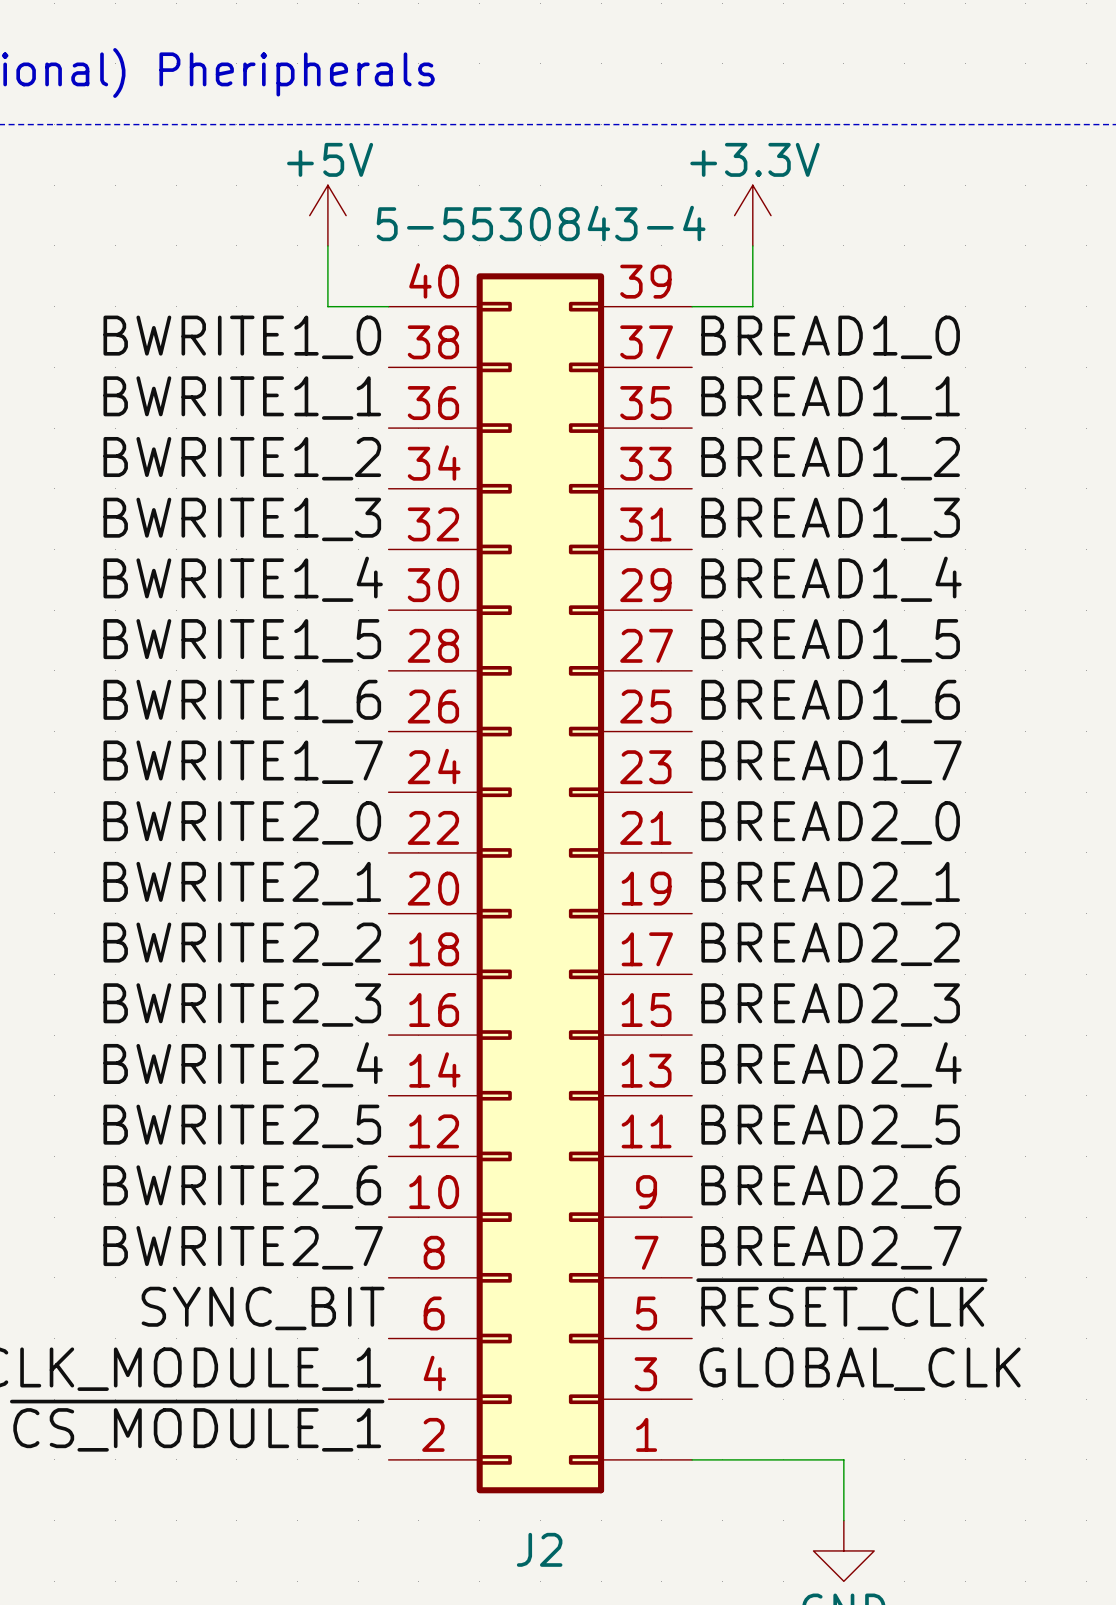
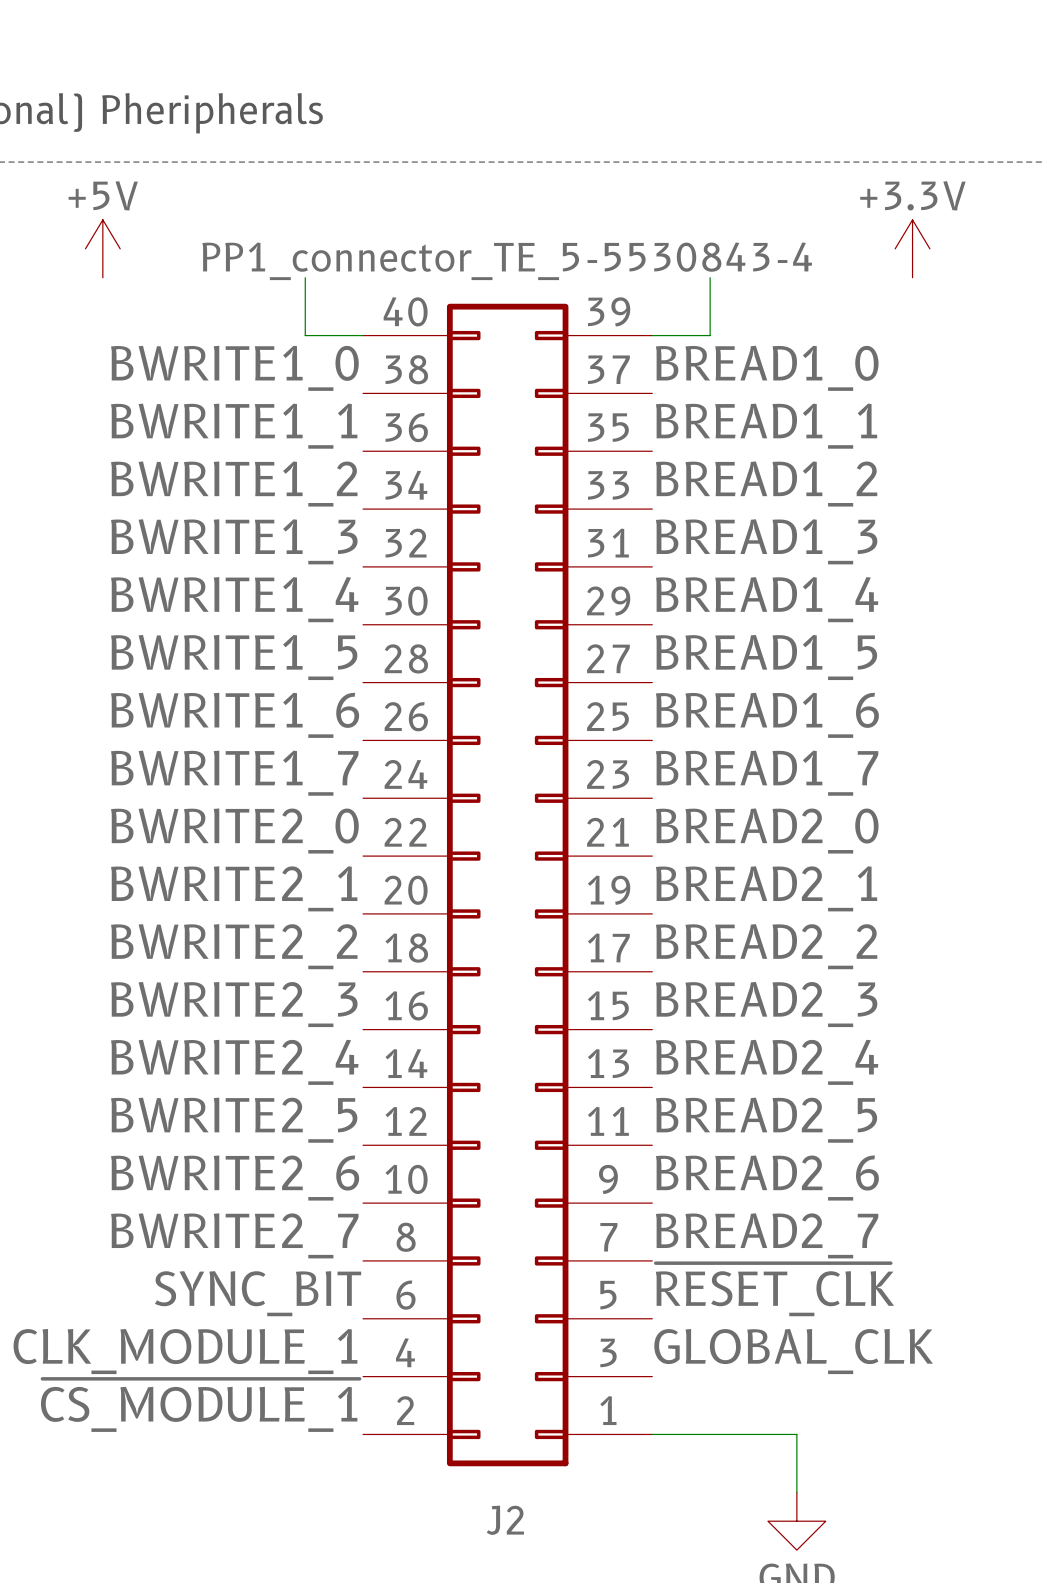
power symbol position: +5V (327, 215) -> +5V (102, 248)
power symbol position: +3.3V (752, 215) -> +3.3V (912, 248)
J2 value: 5-5530843-4 (541, 223) -> PP1_connector_TE_5-5530843-4 (507, 261)

